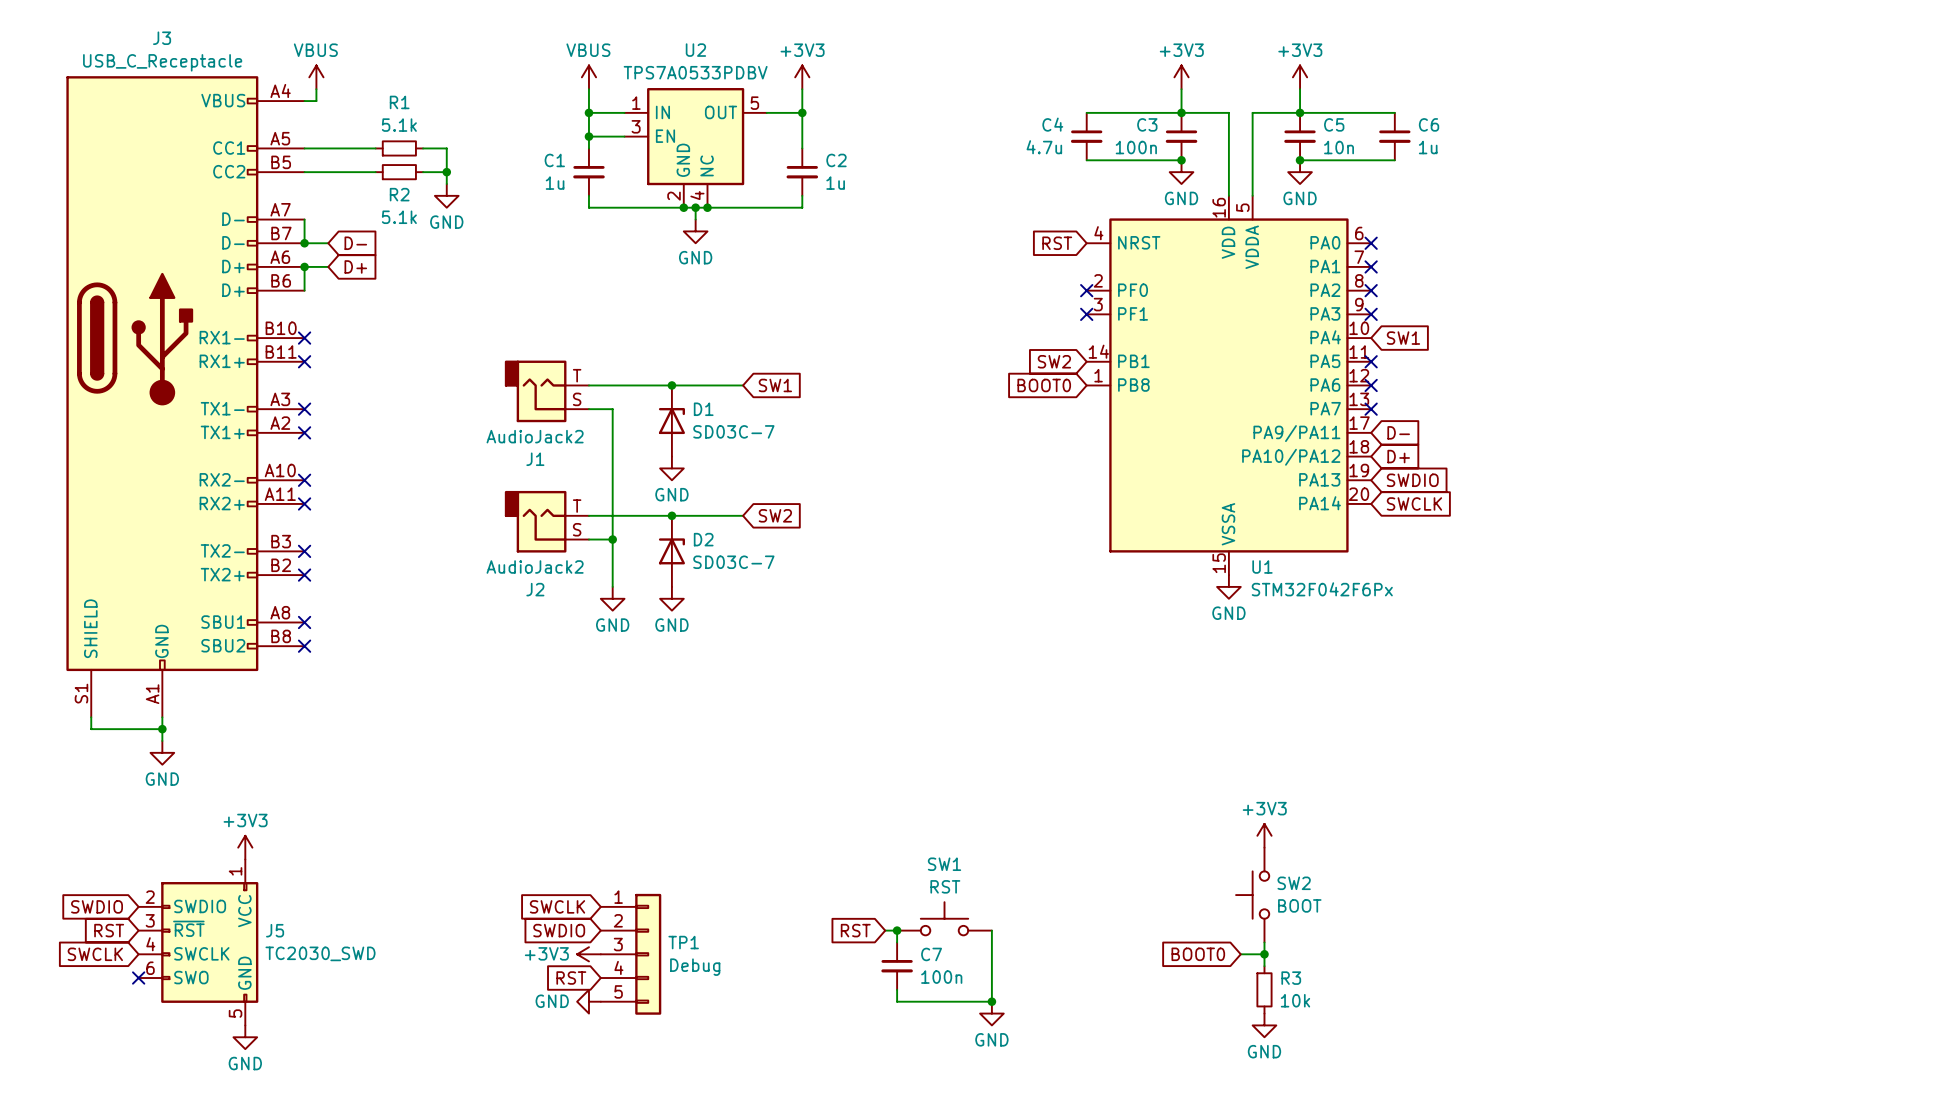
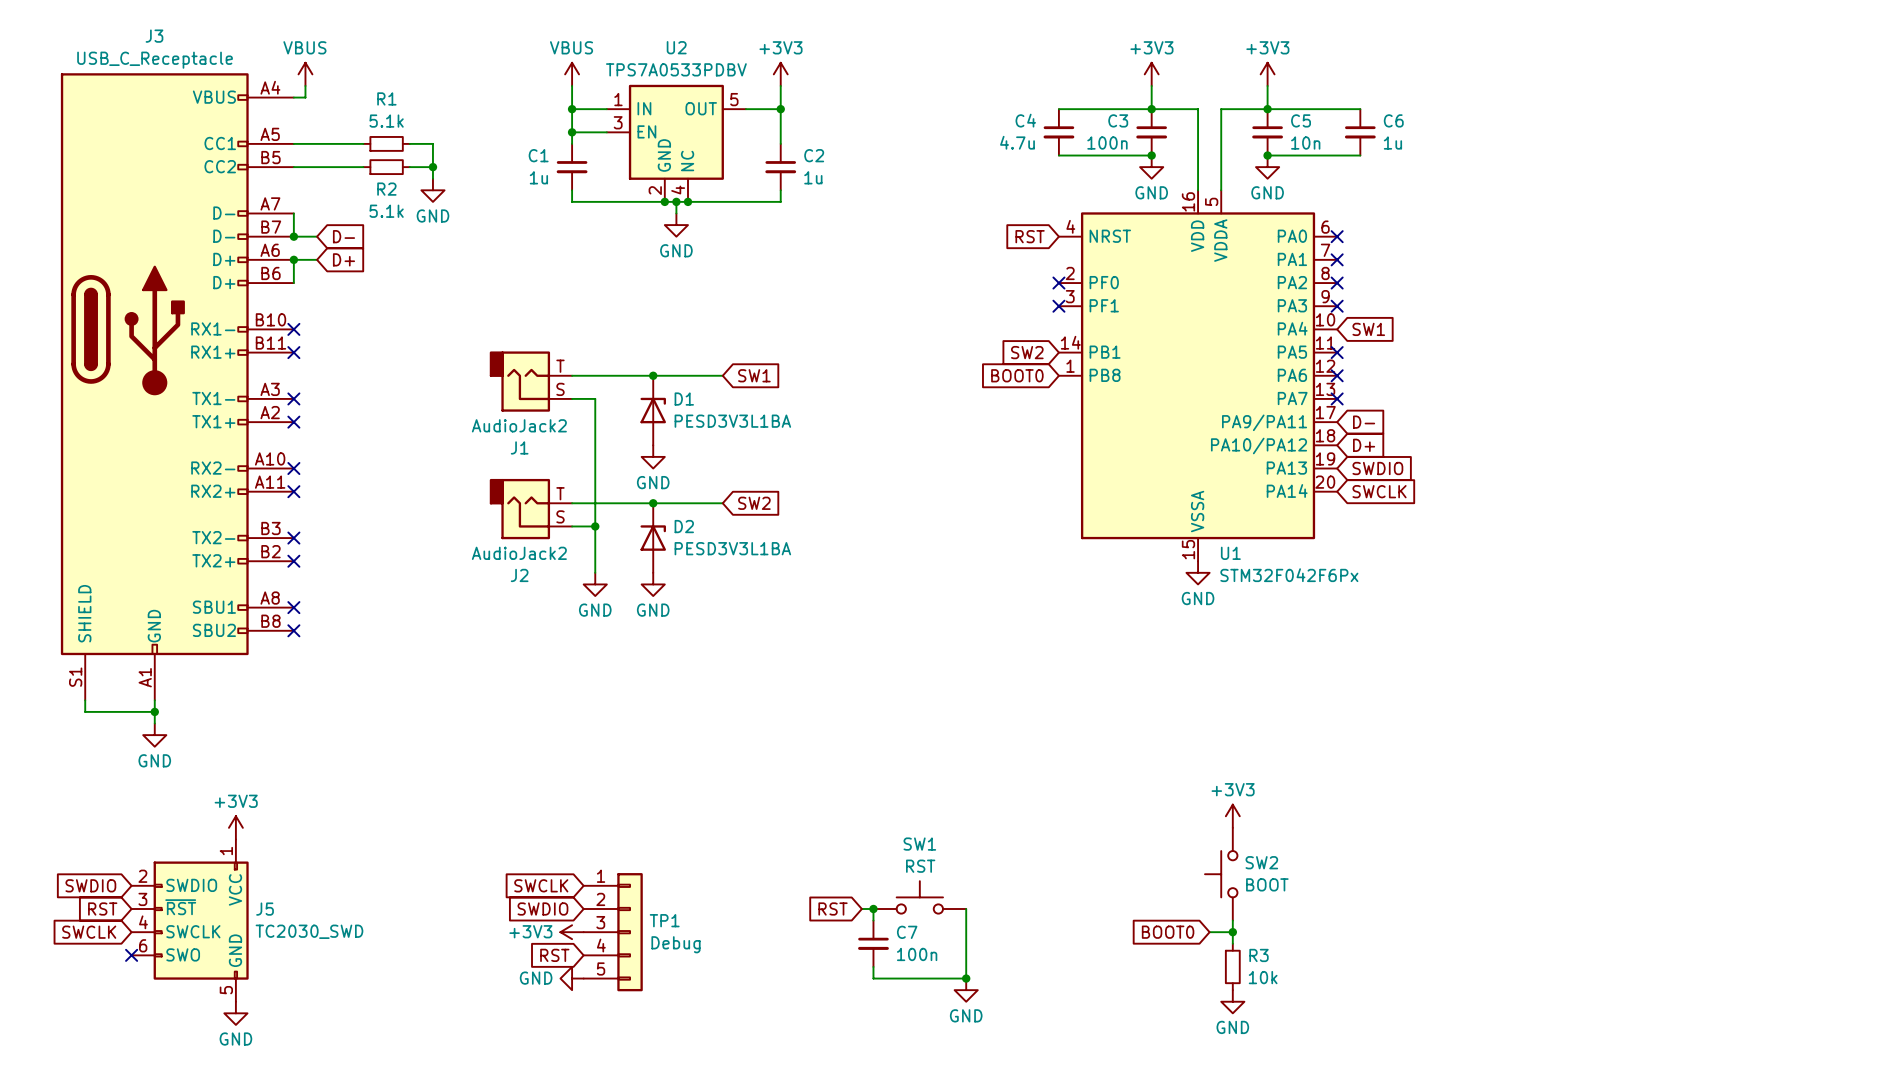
D1 value: SD03C-7 (733, 431) -> PESD3V3L1BA (732, 421)
D2 value: SD03C-7 (733, 562) -> PESD3V3L1BA (732, 548)

